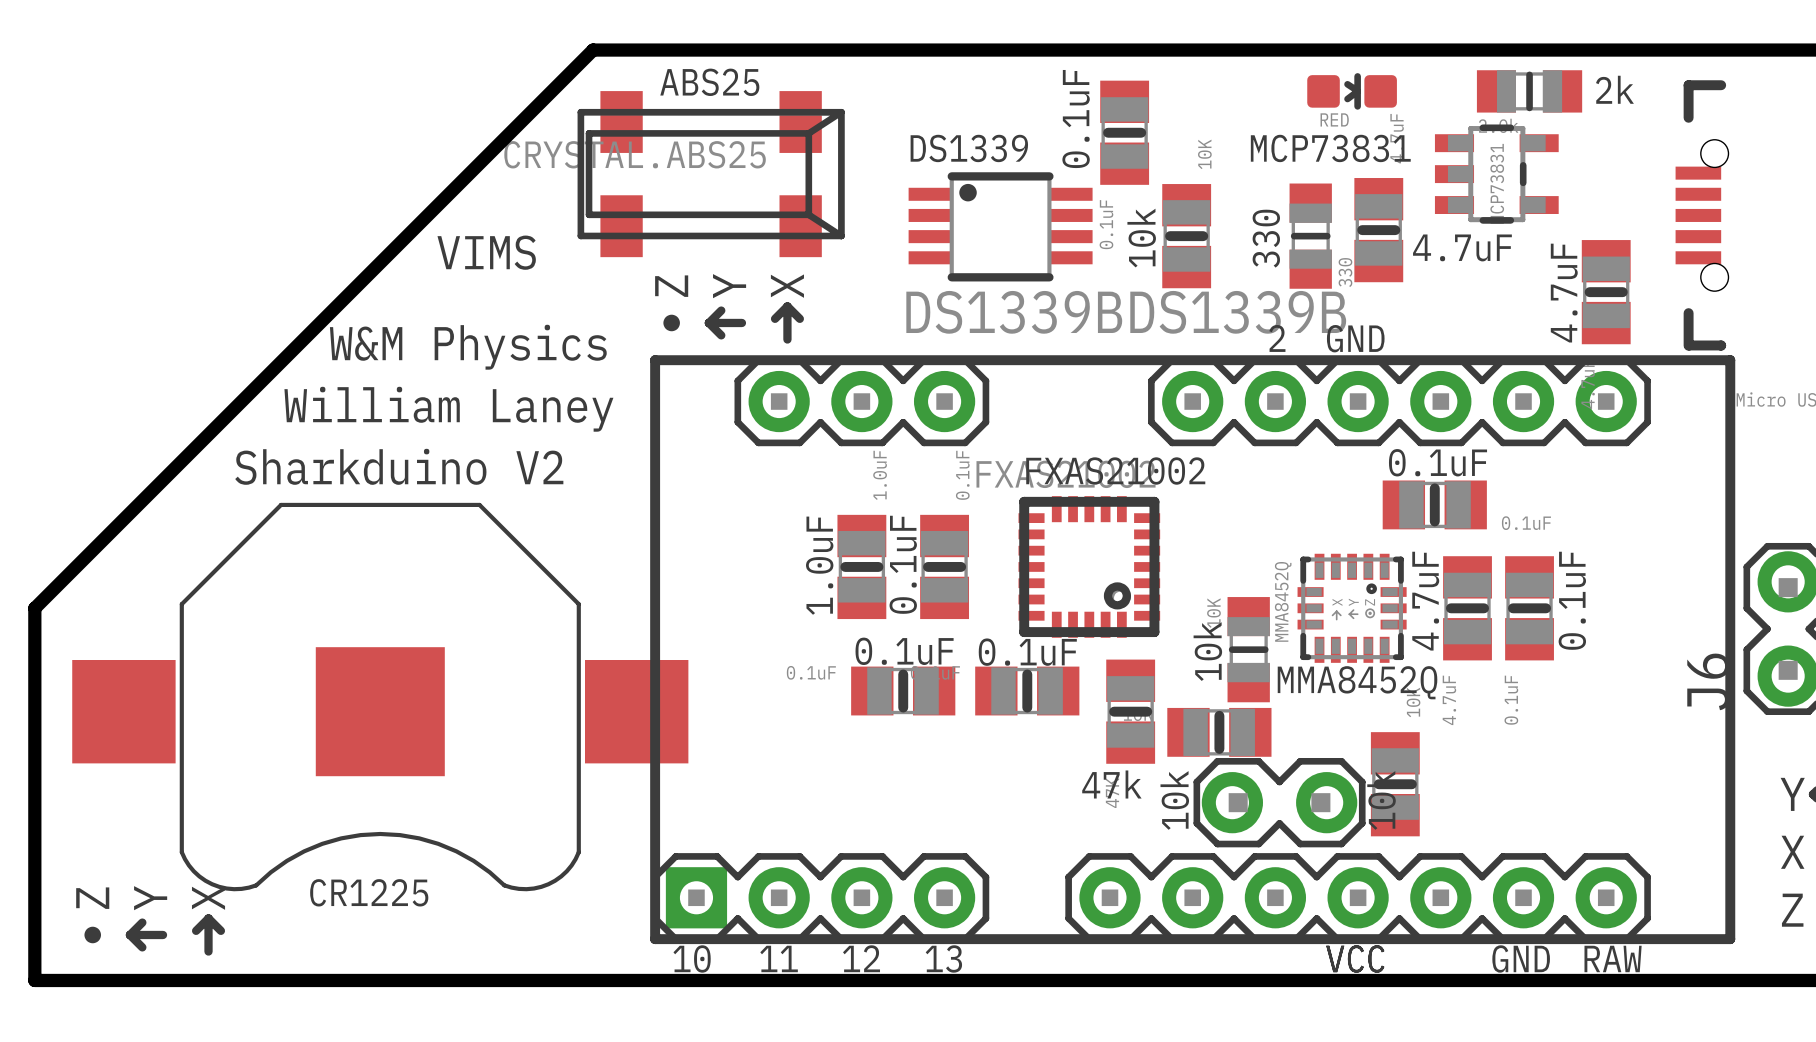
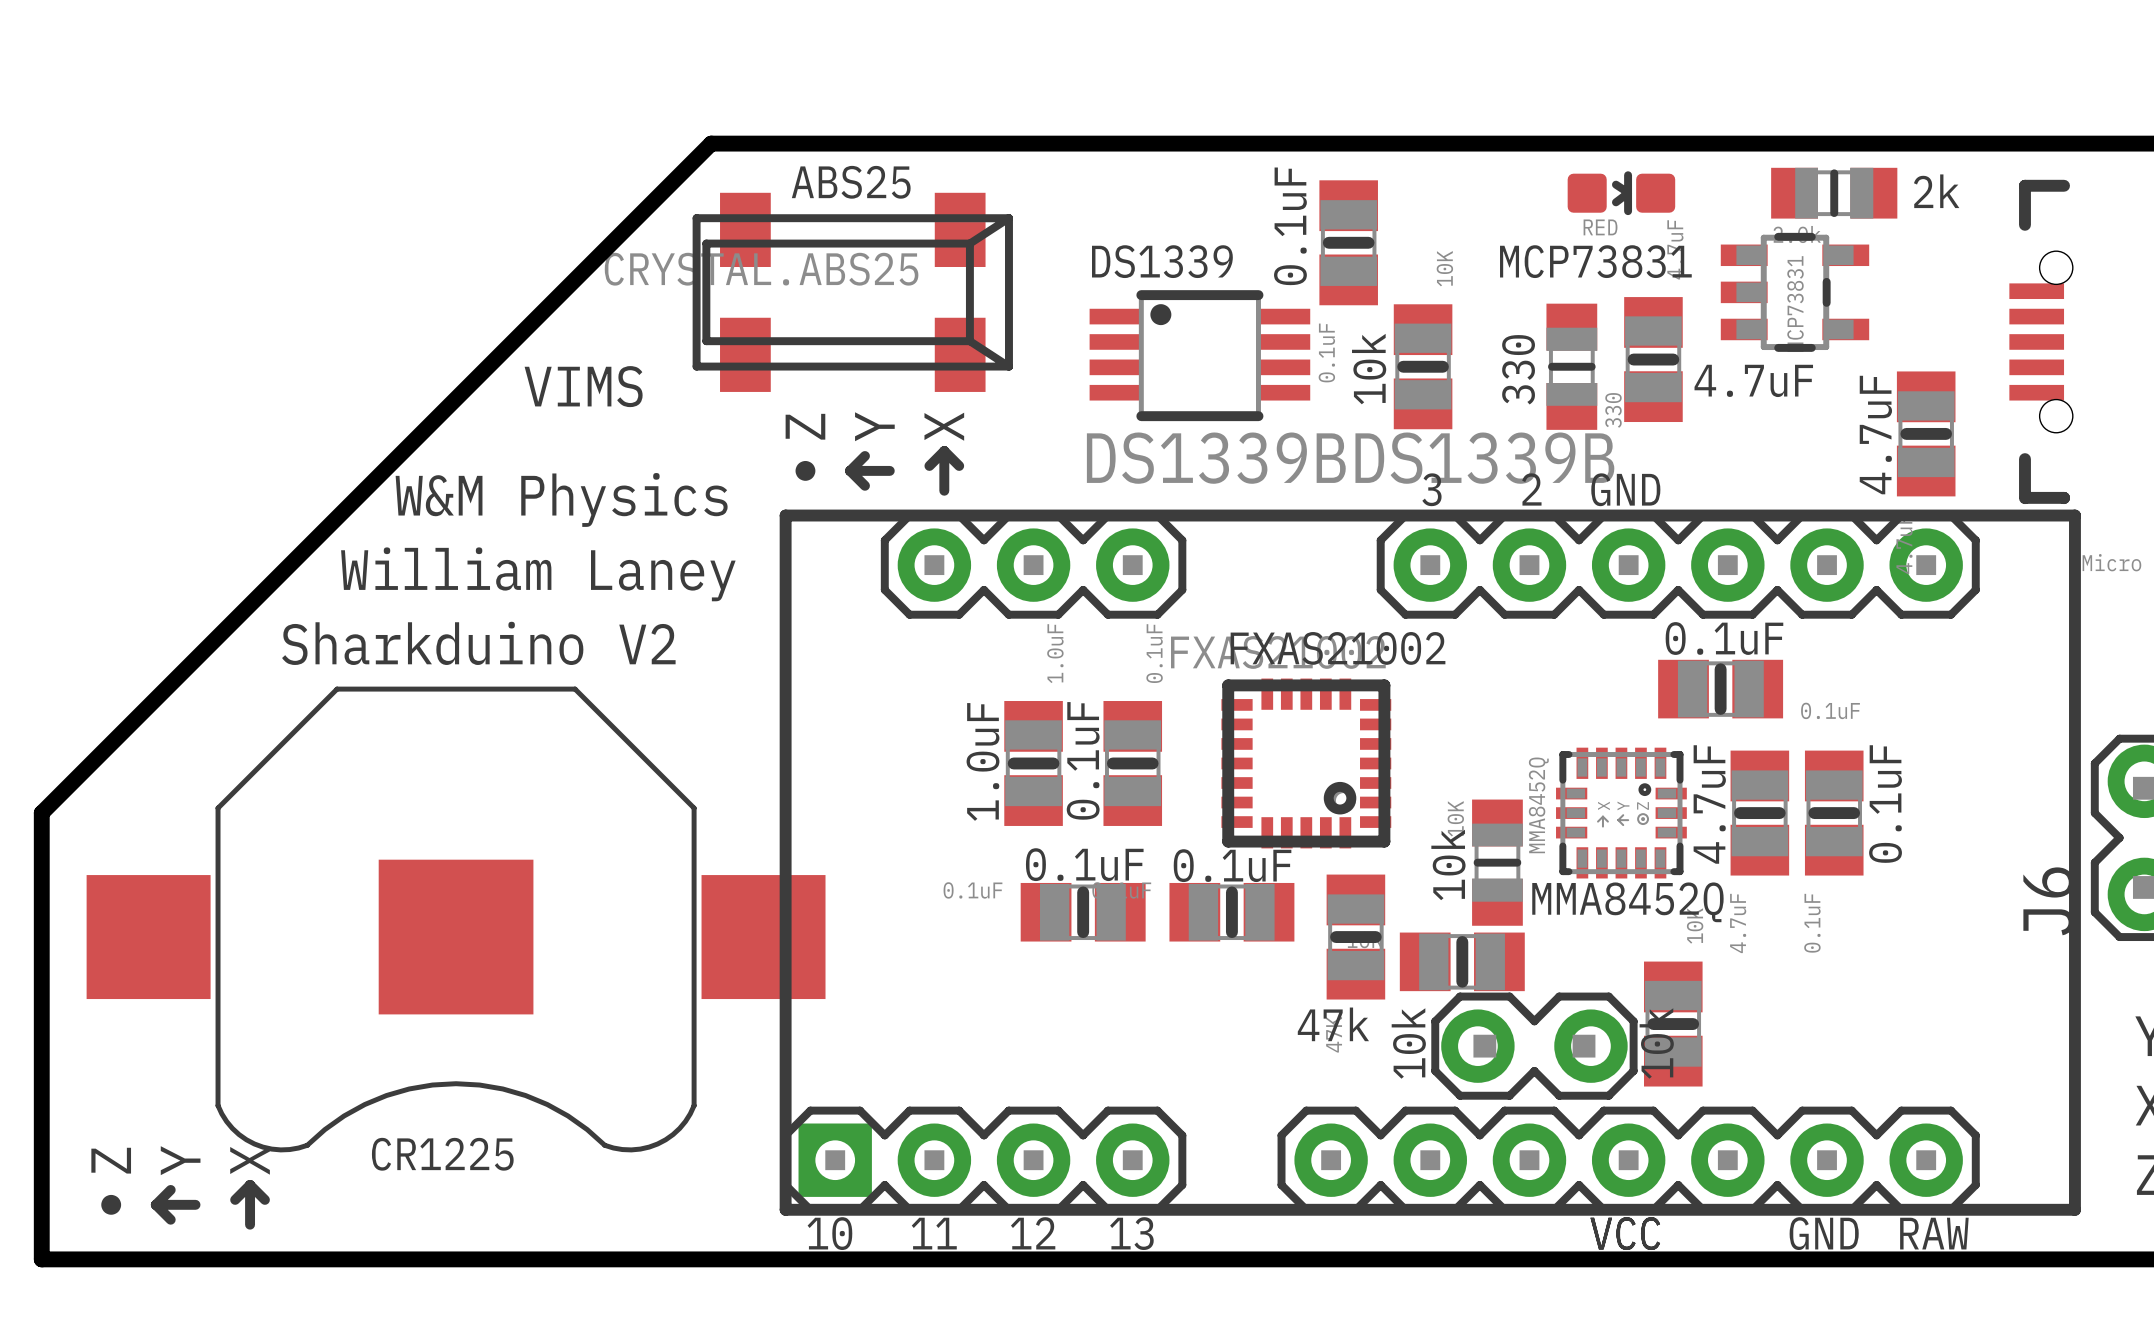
text: none -> 3 (1431, 489)

